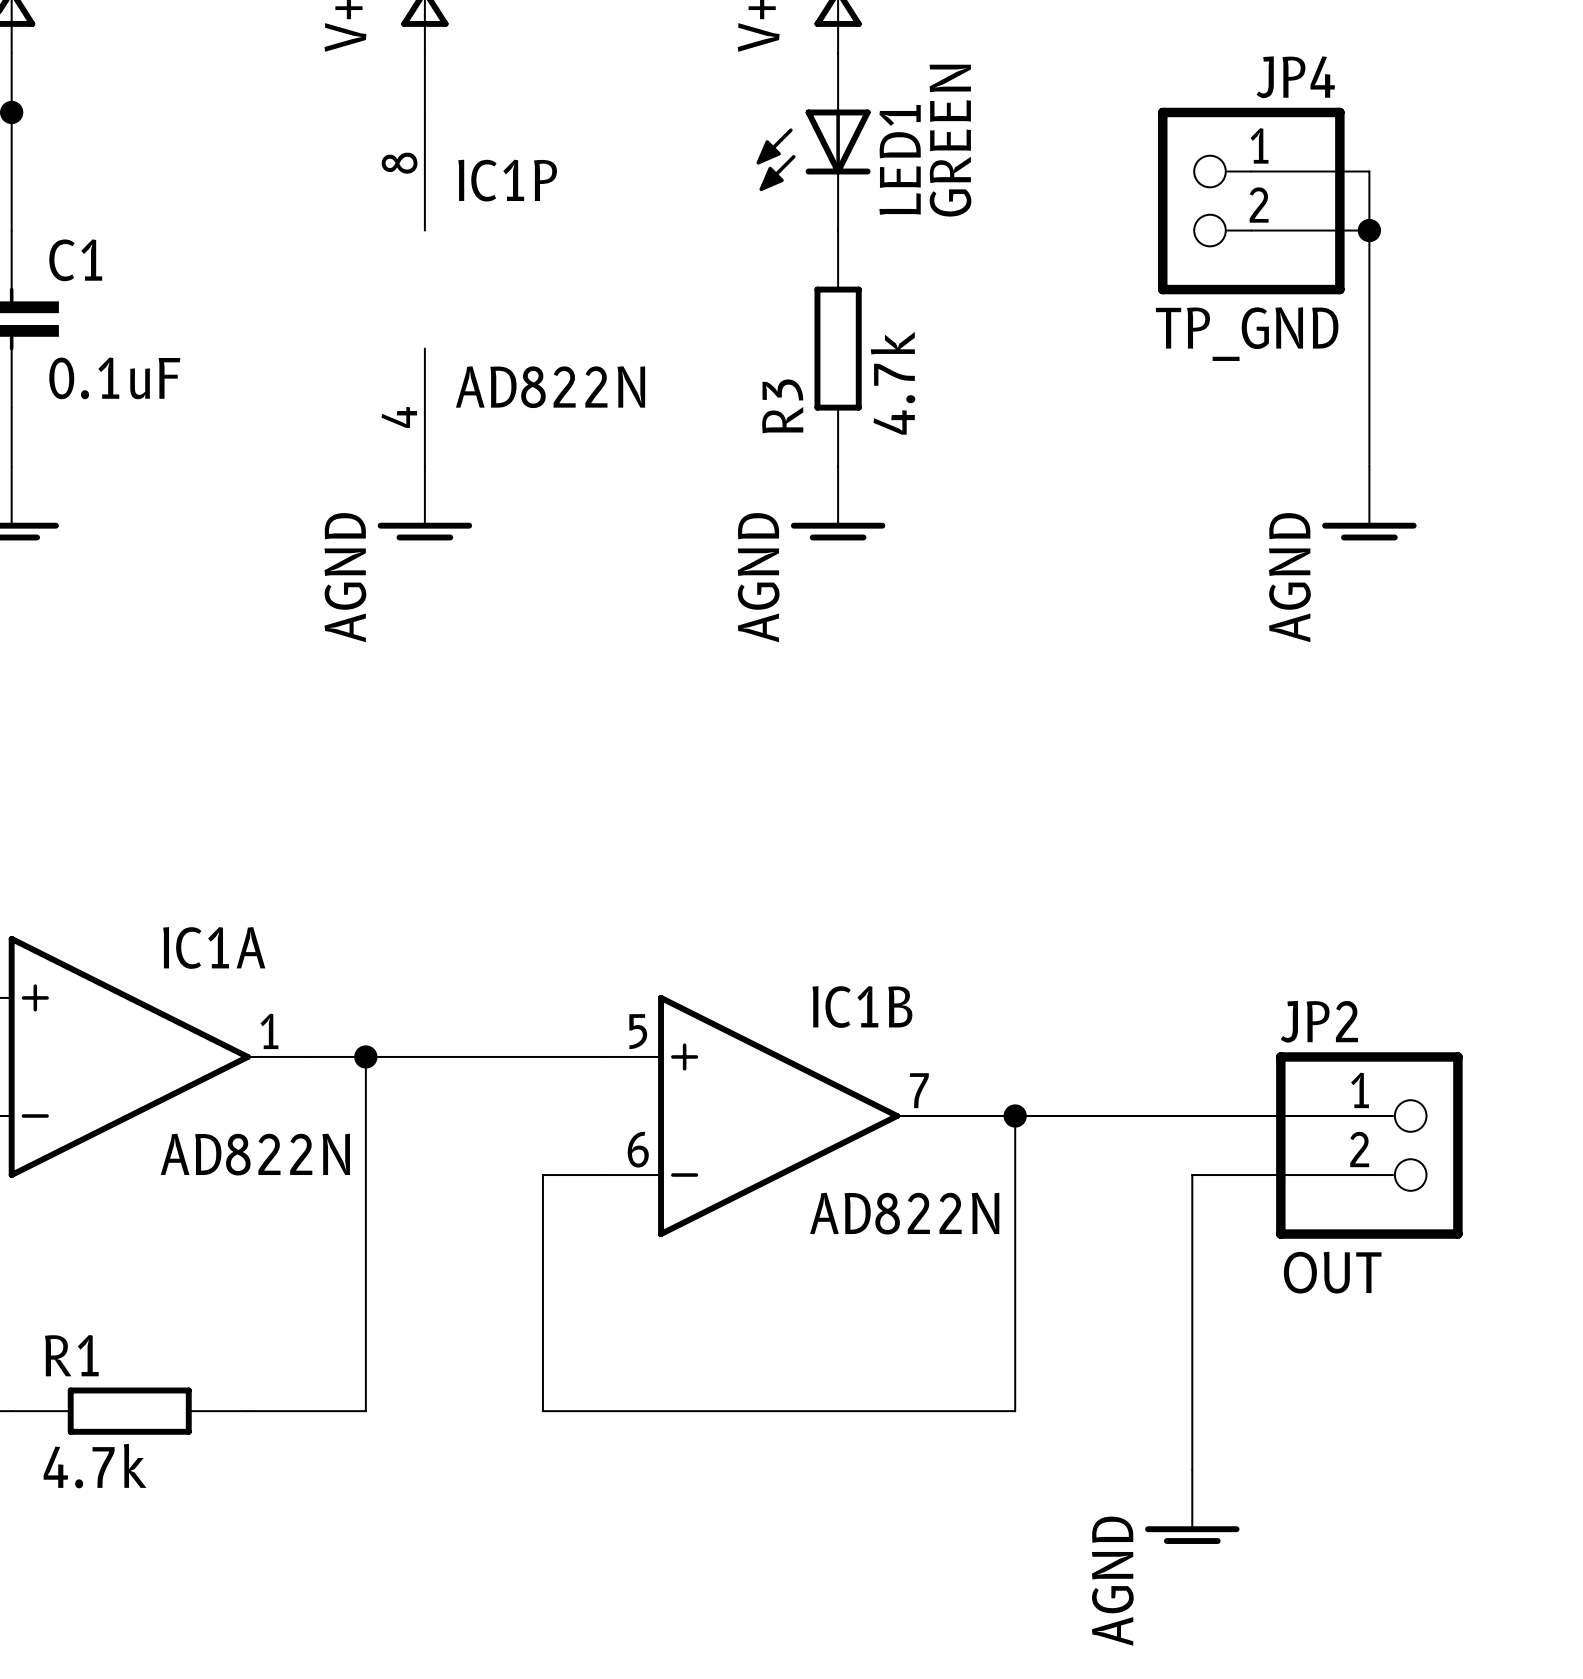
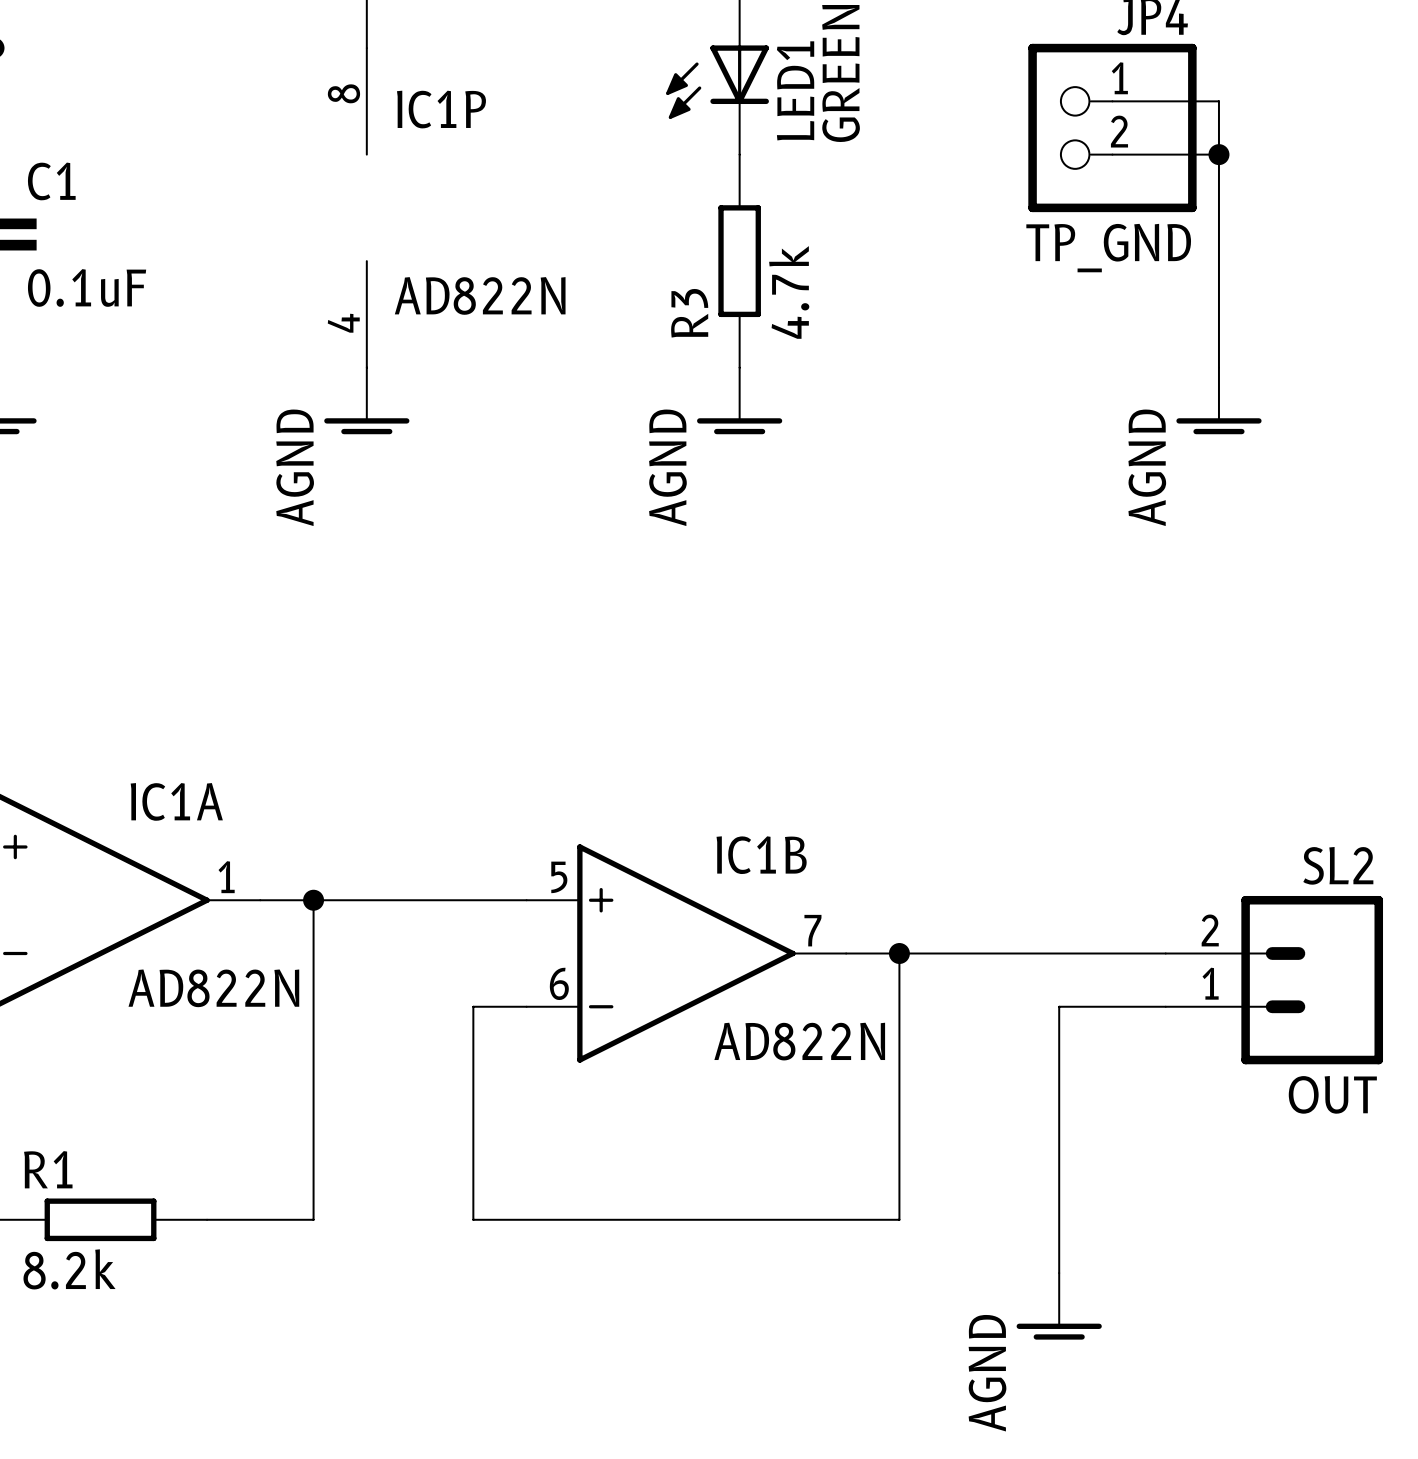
JP2: OUT (1369, 1145) -> none
SL2: none -> OUT (1274, 980)
R1 value: 4.7k (95, 1466) -> 8.2k (69, 1269)

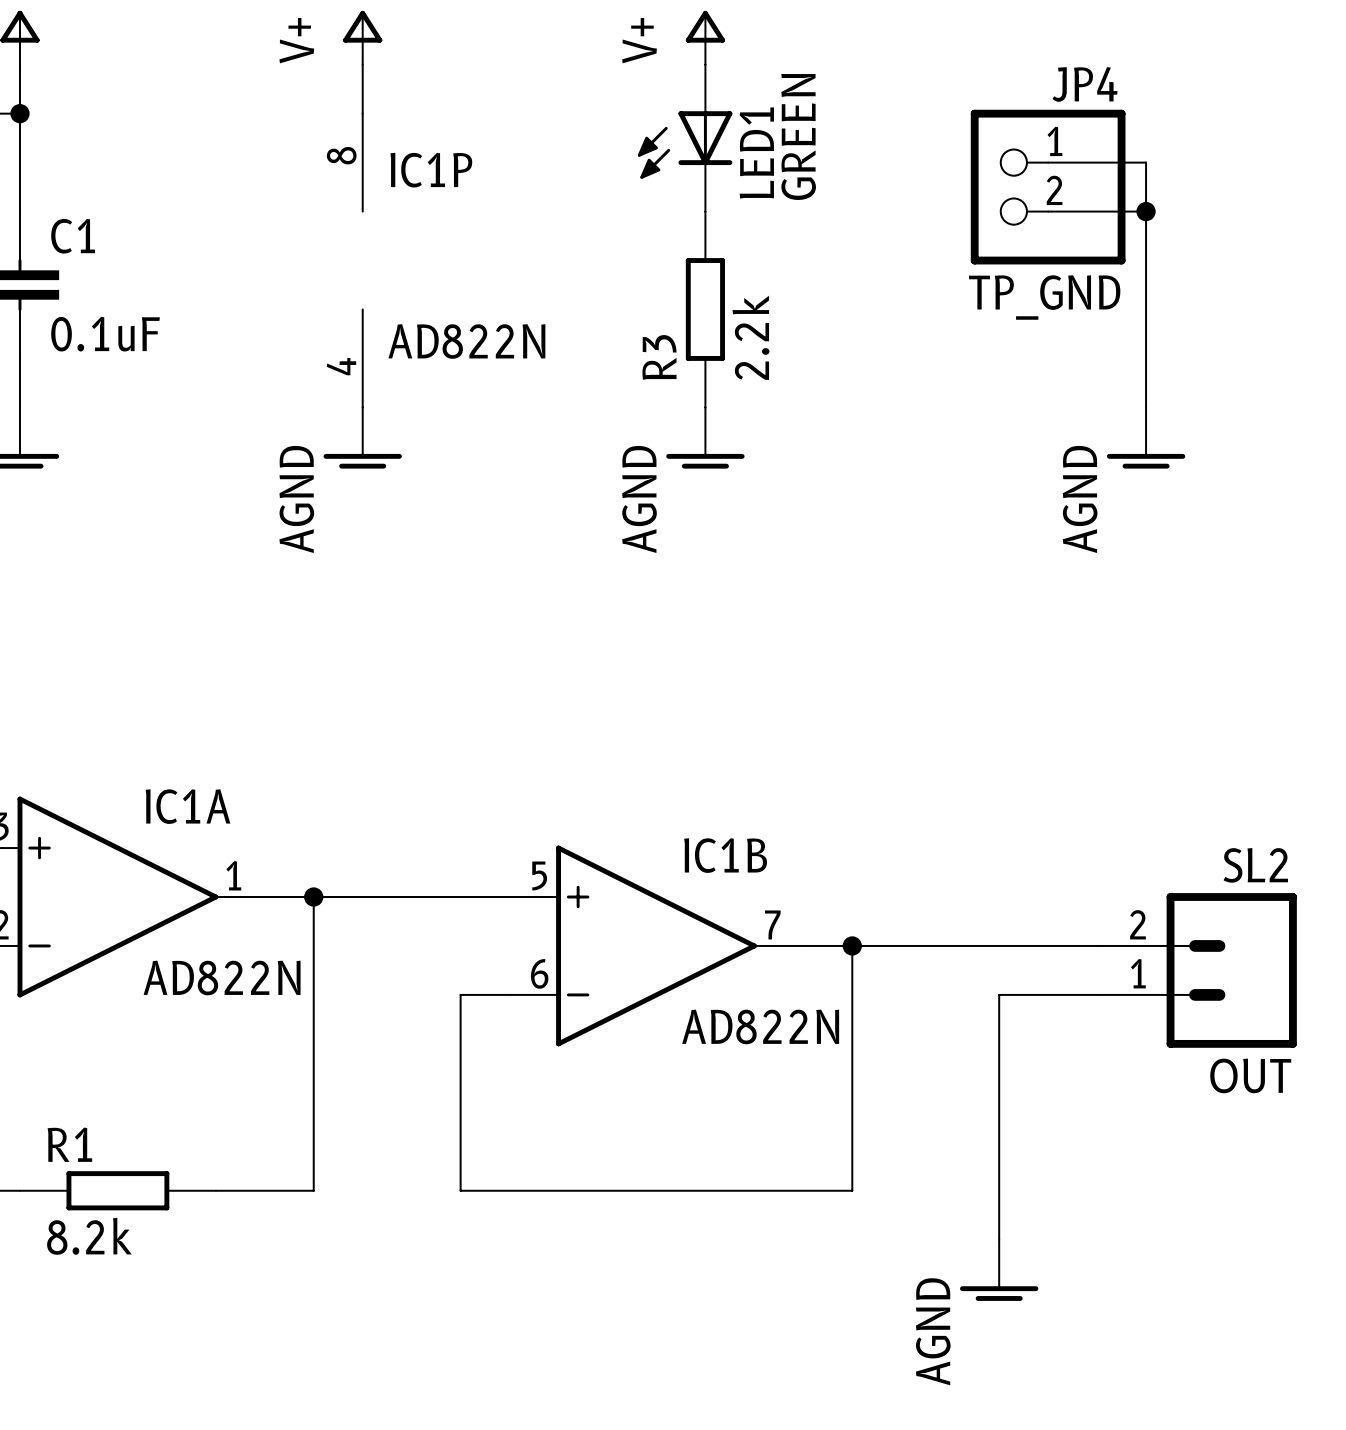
R3 value: 4.7k (789, 292) -> 2.2k (750, 337)

